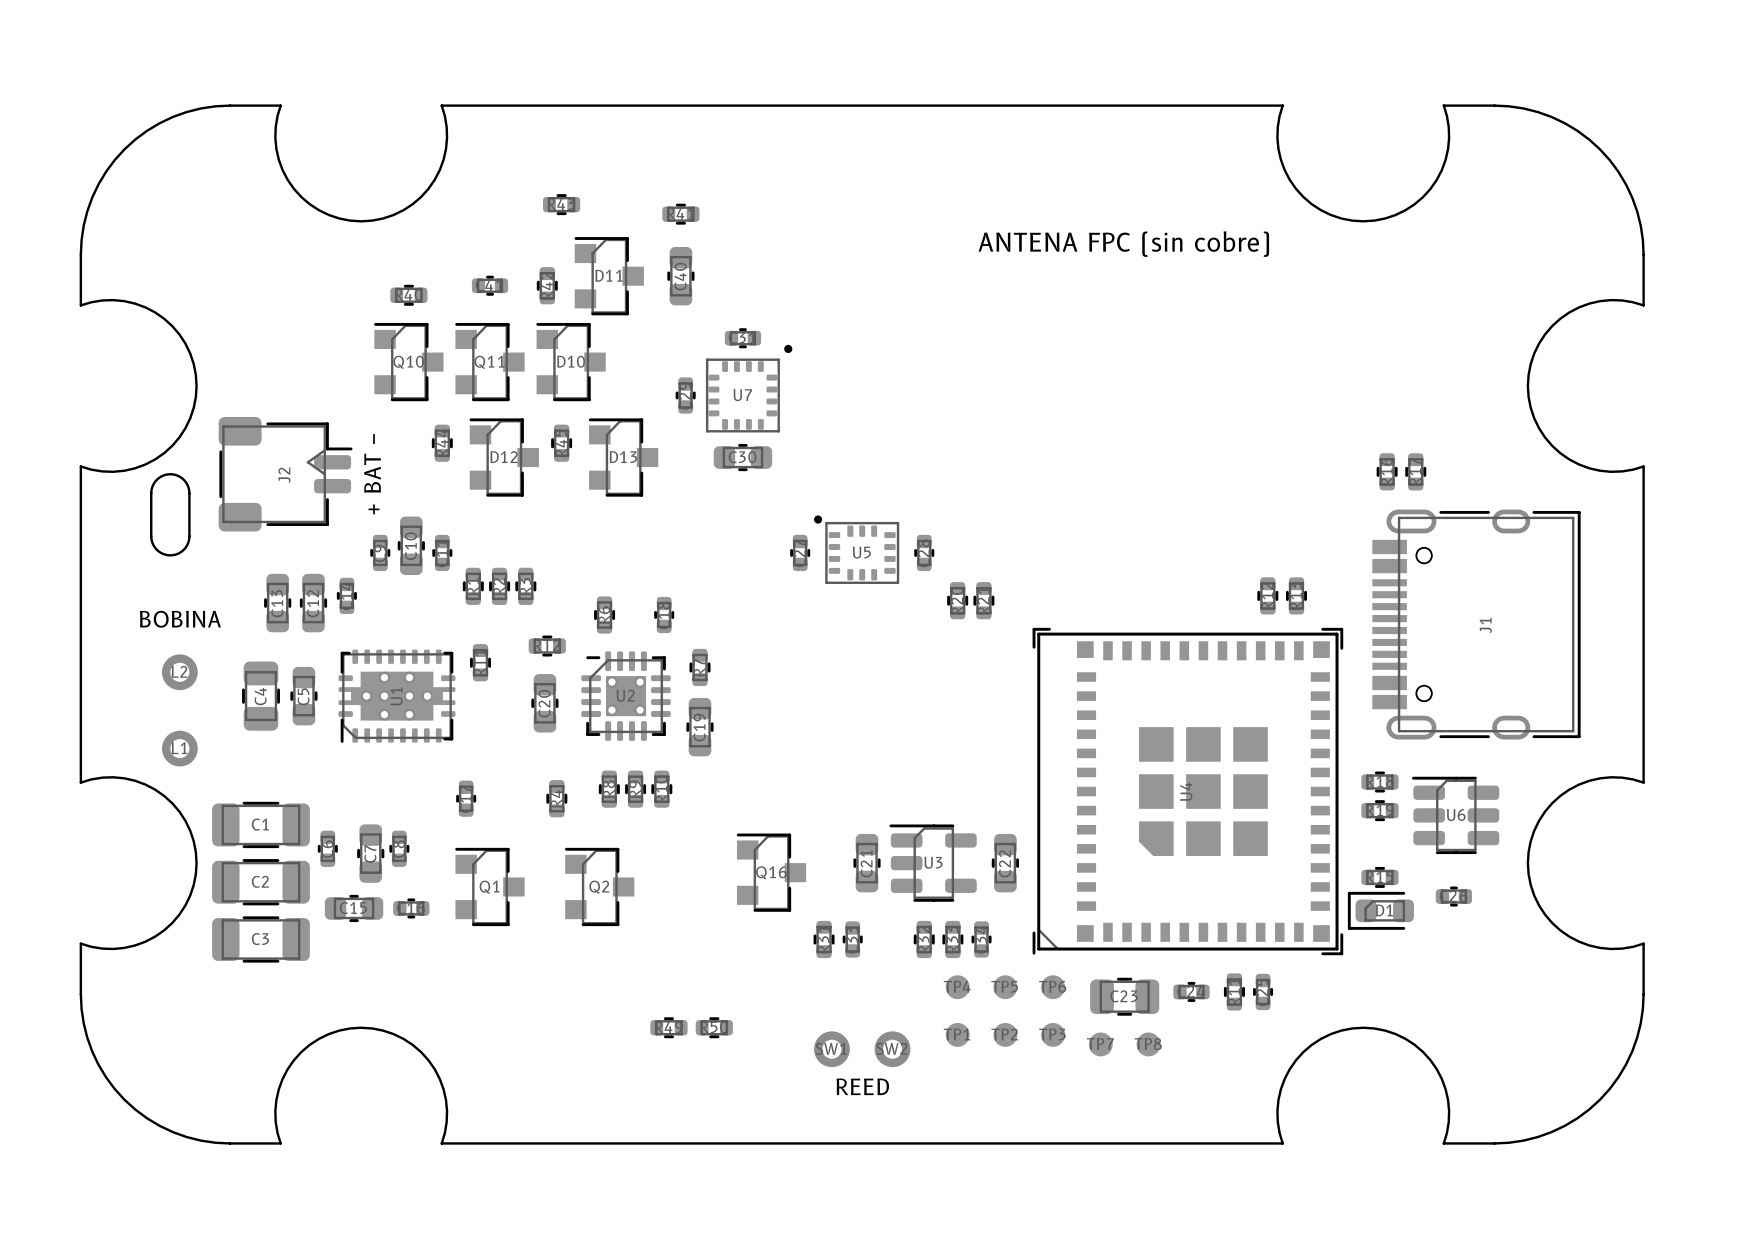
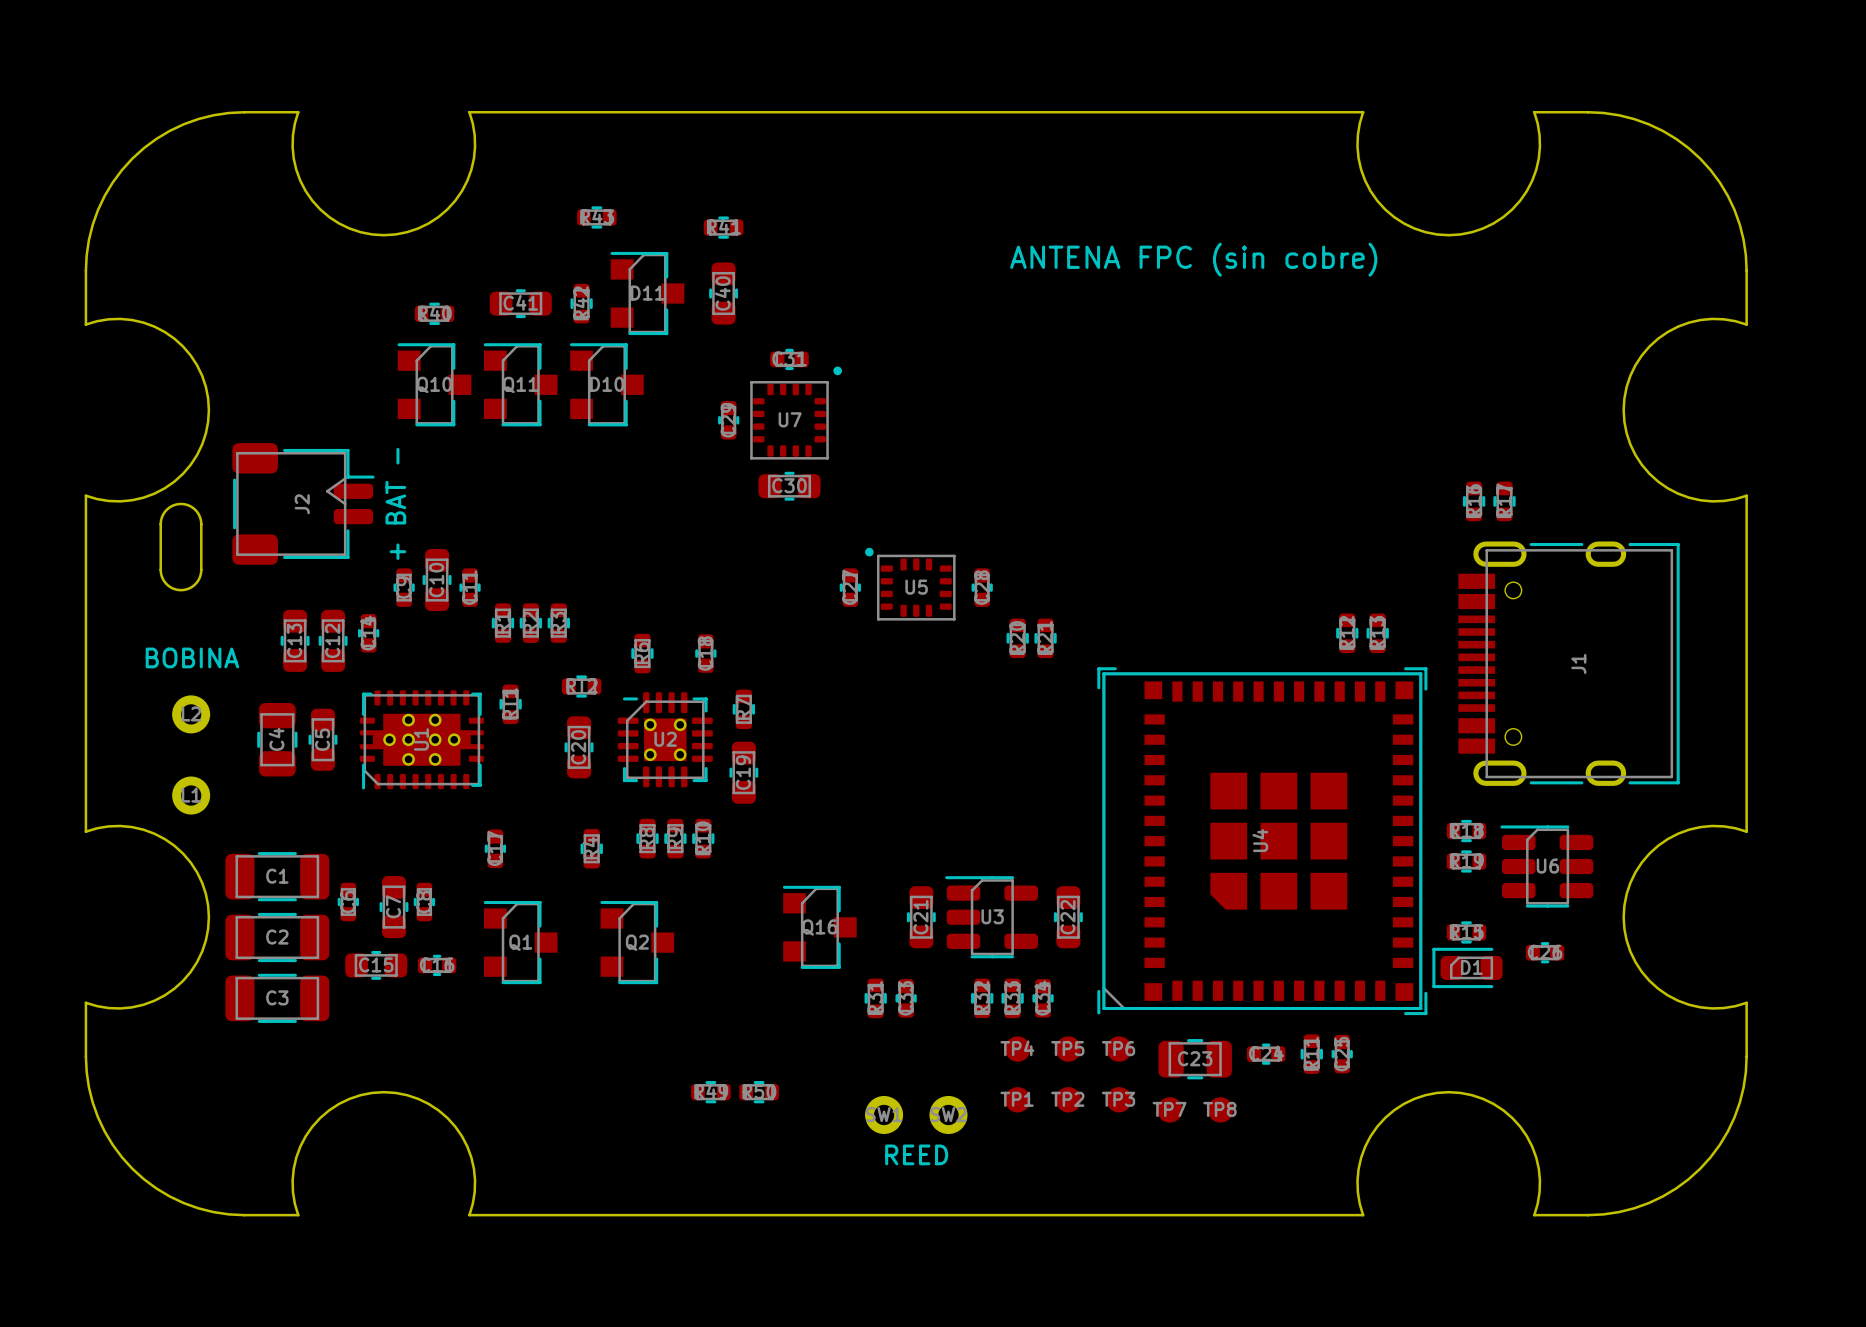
C41 footprint: [471, 275, 509, 296] -> [489, 289, 552, 319]
part: (442, 443) -> none
part: (561, 443) -> none
D12: (504, 457) -> none
D13: (623, 457) -> none

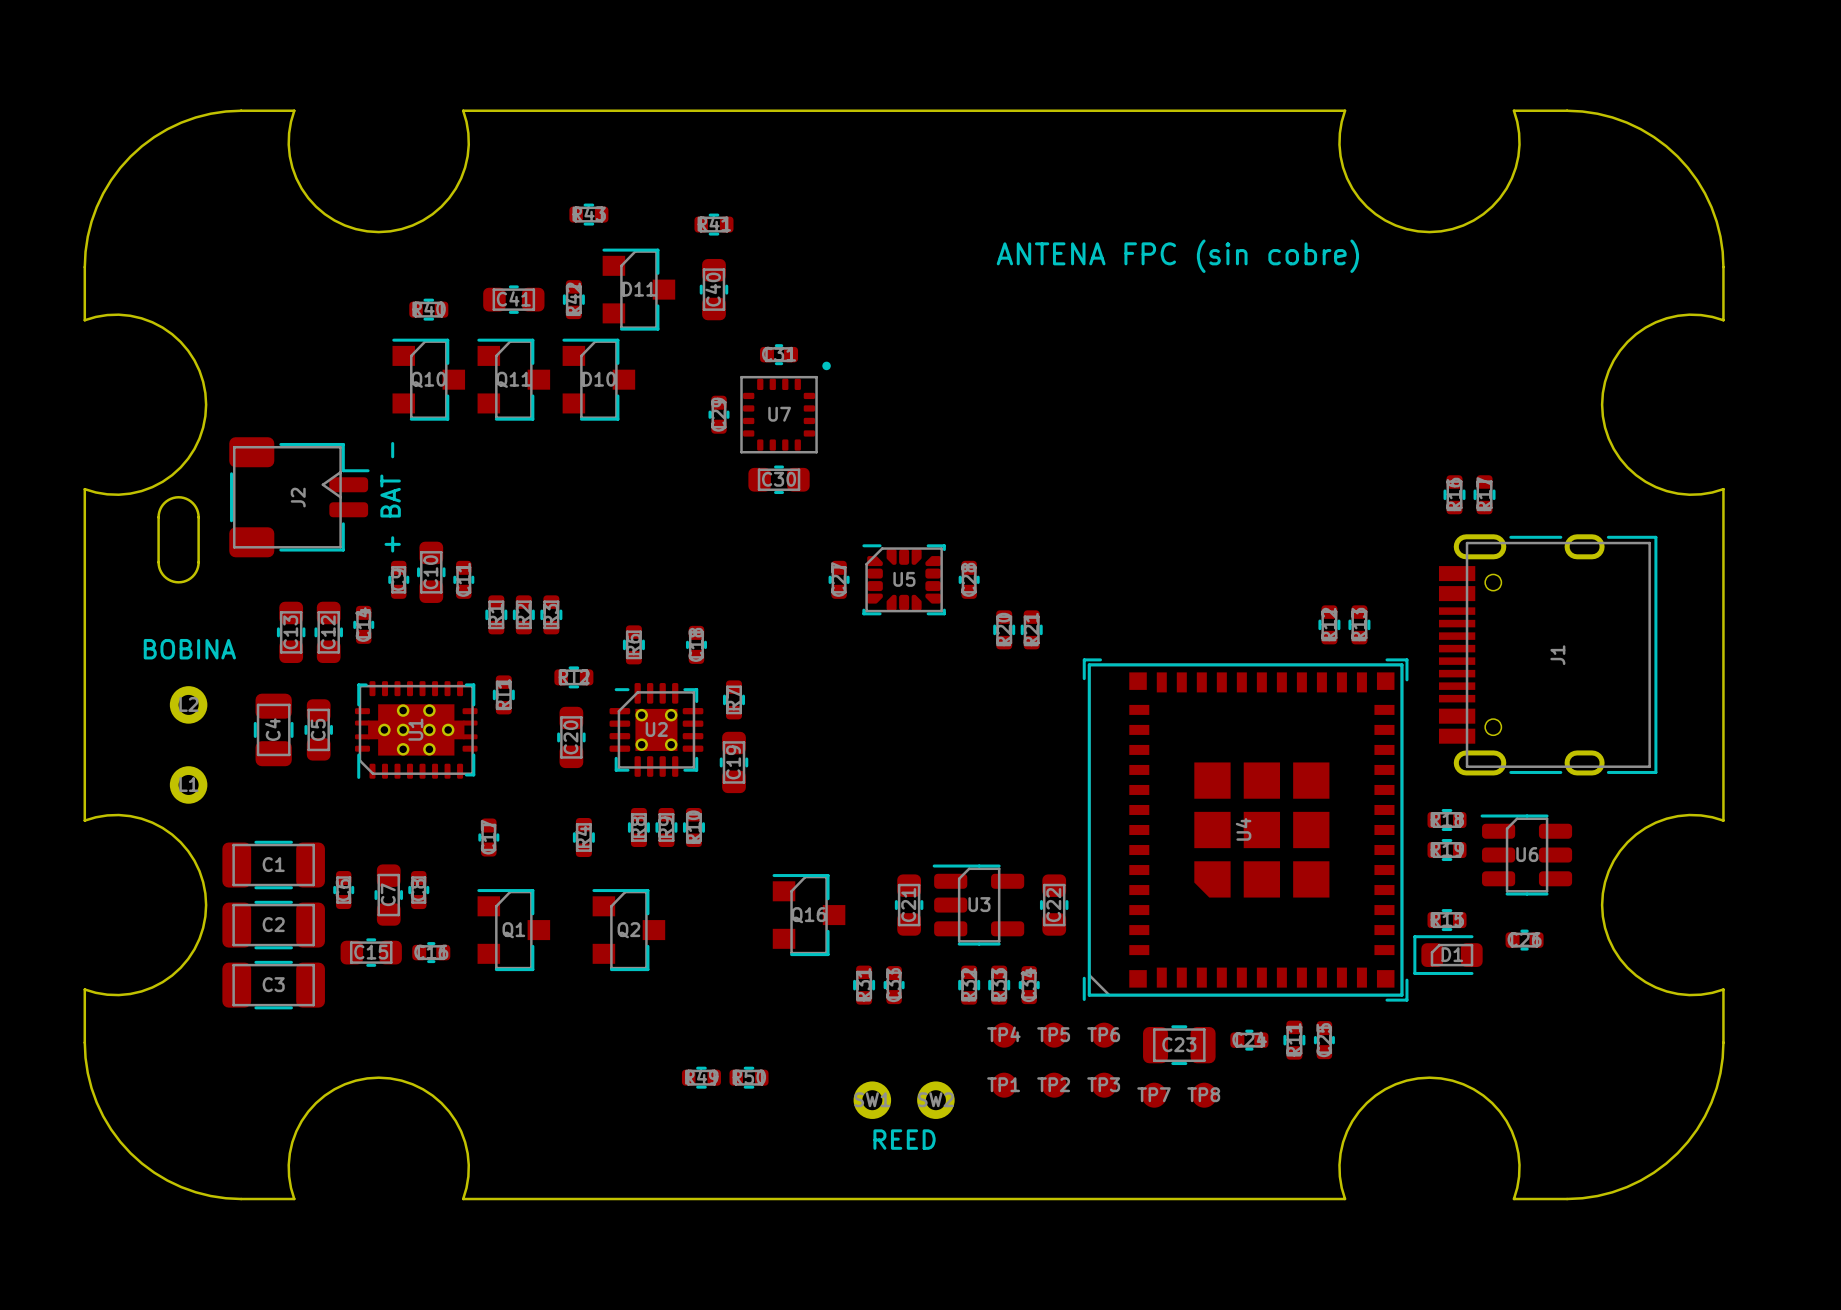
U5 footprint: [865, 547, 956, 621] -> [862, 544, 946, 616]

